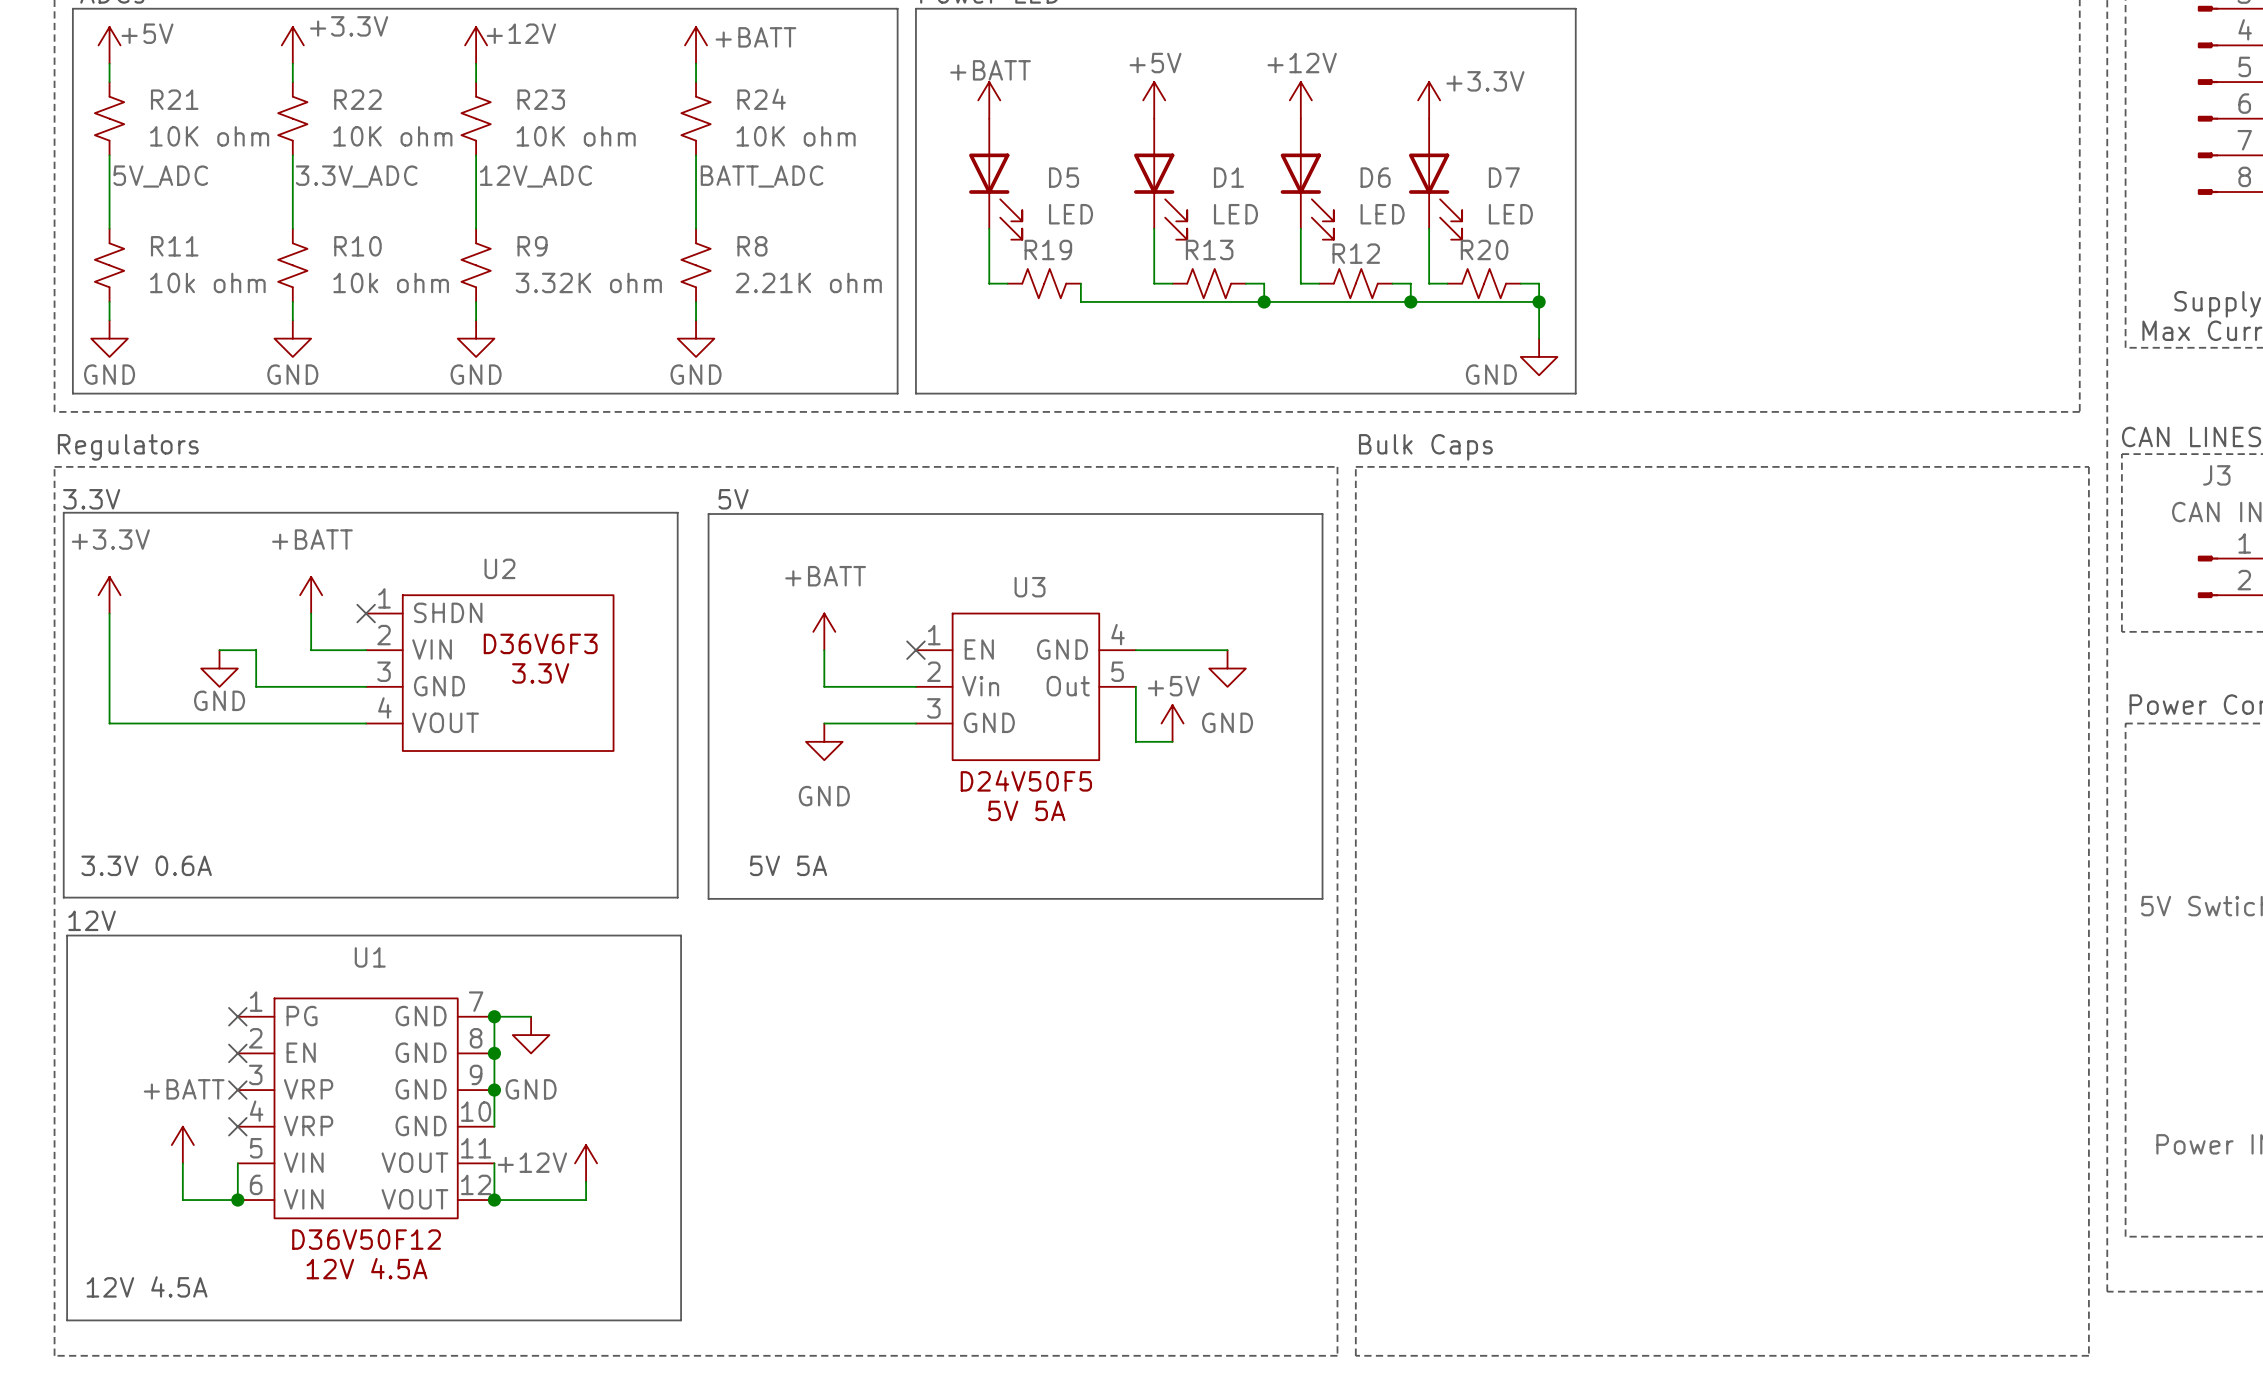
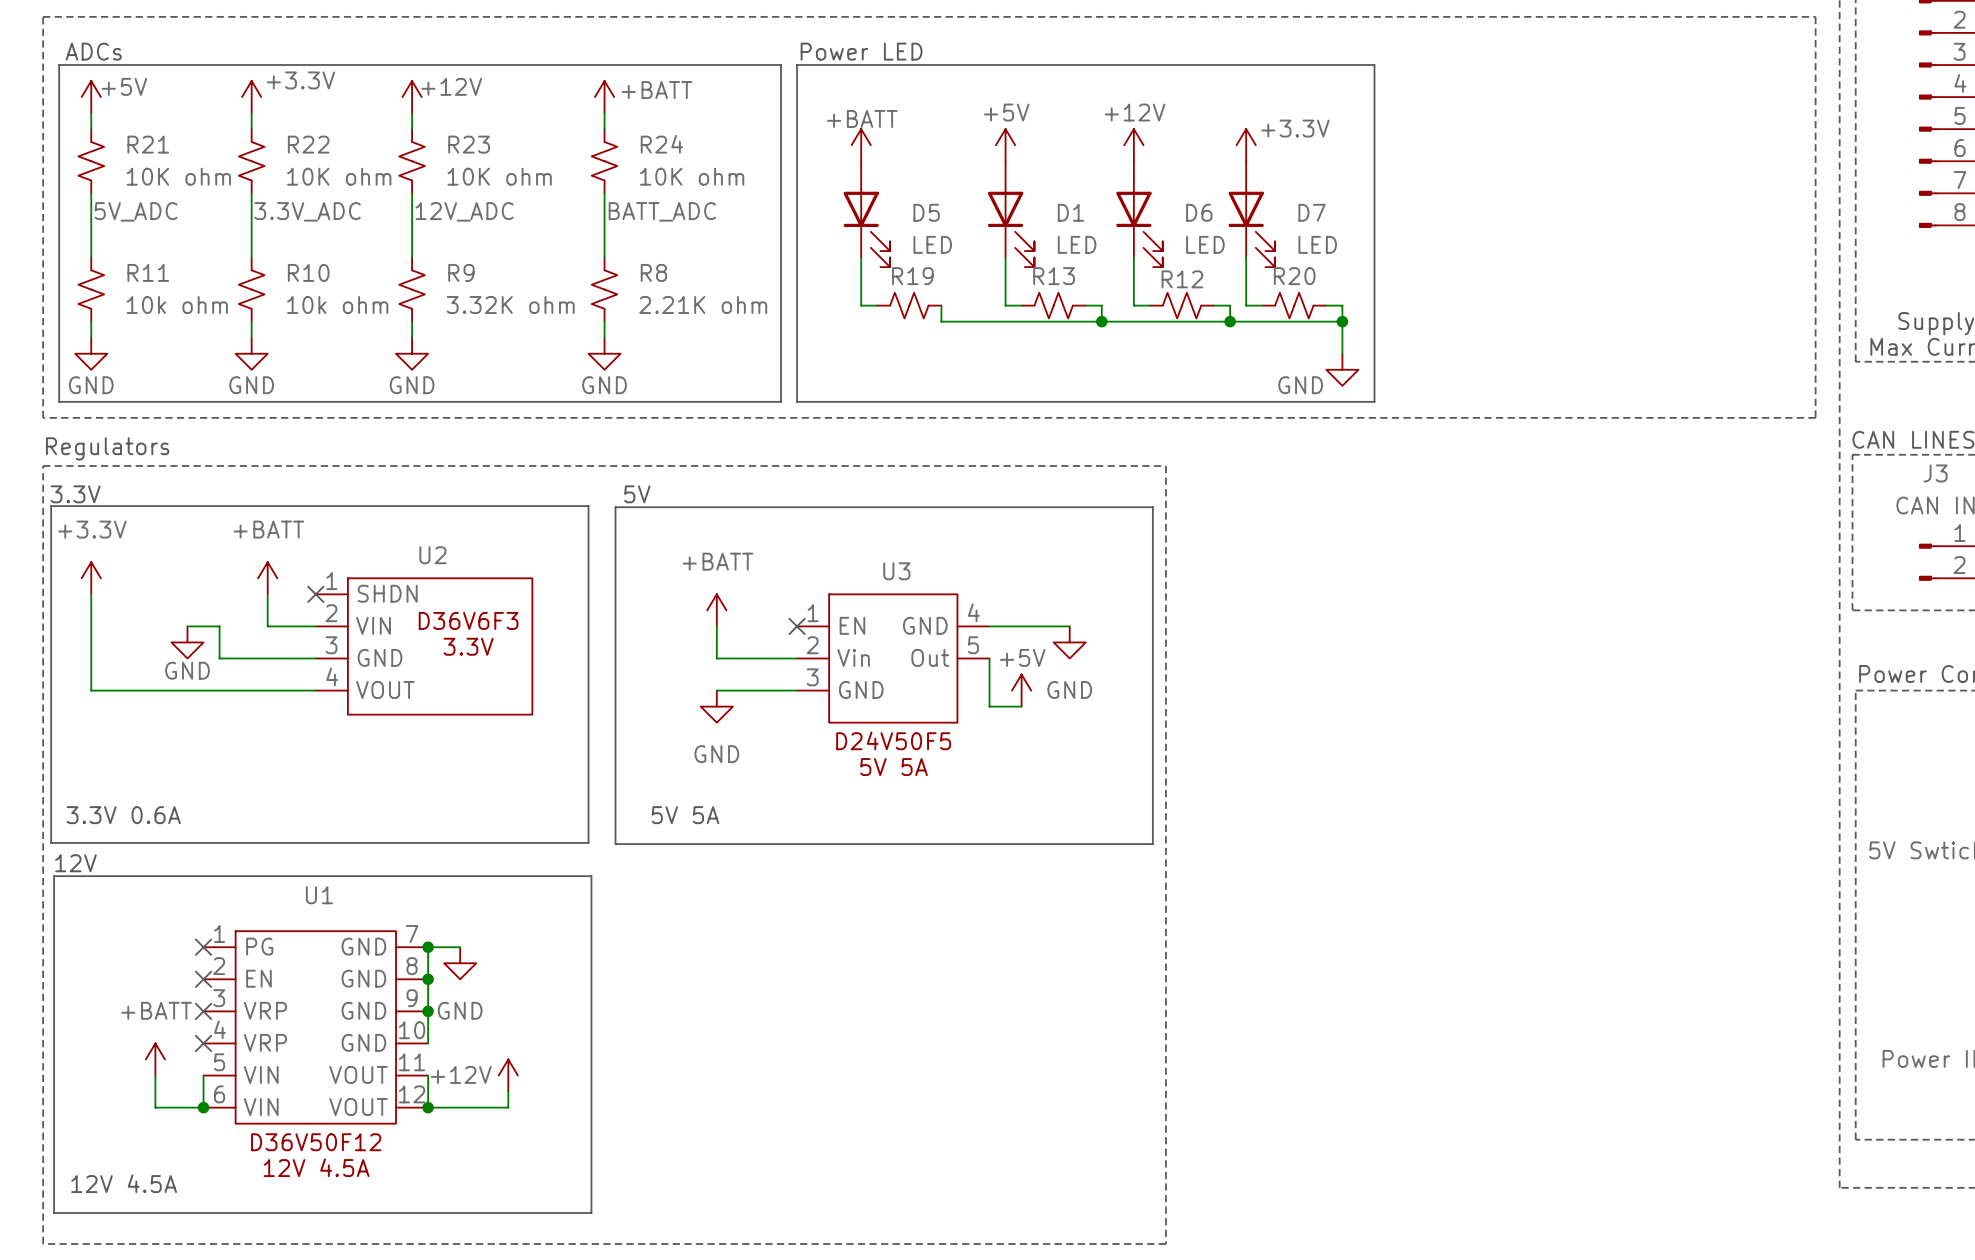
text: Bulk Caps (1425, 447) -> none
line: (1355, 466) (2088, 466) (2088, 1355) (1355, 1355) (1355, 466) -> none

